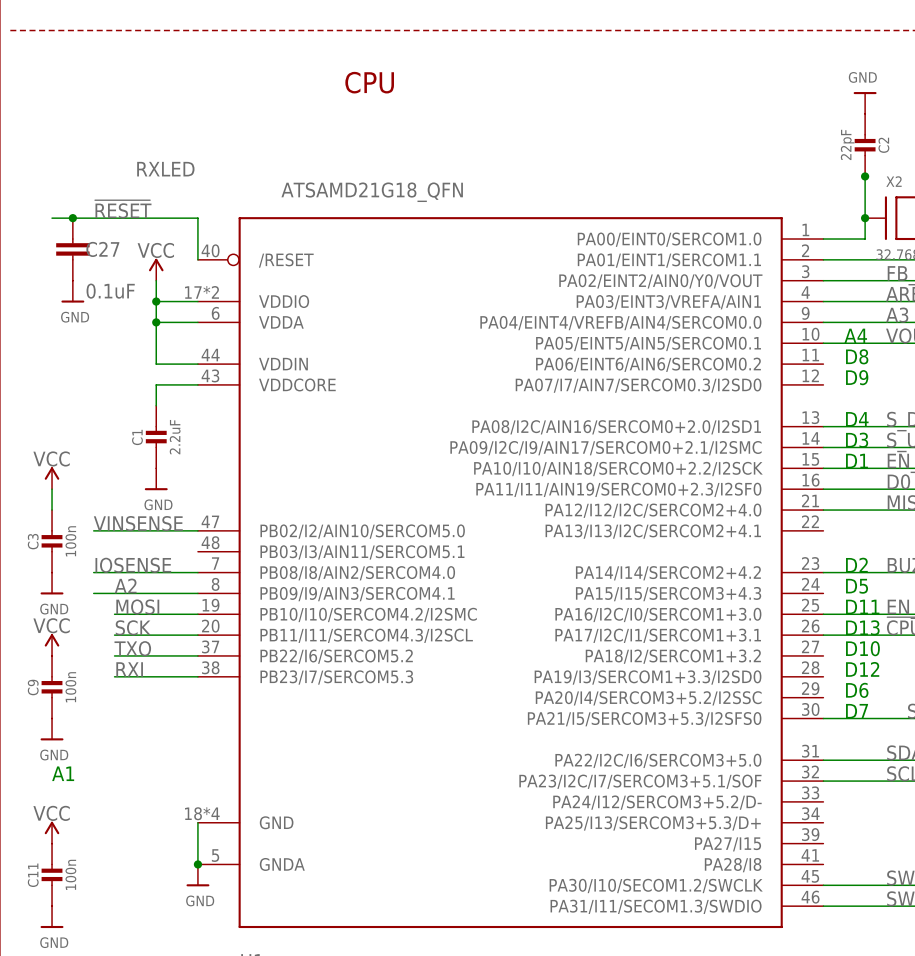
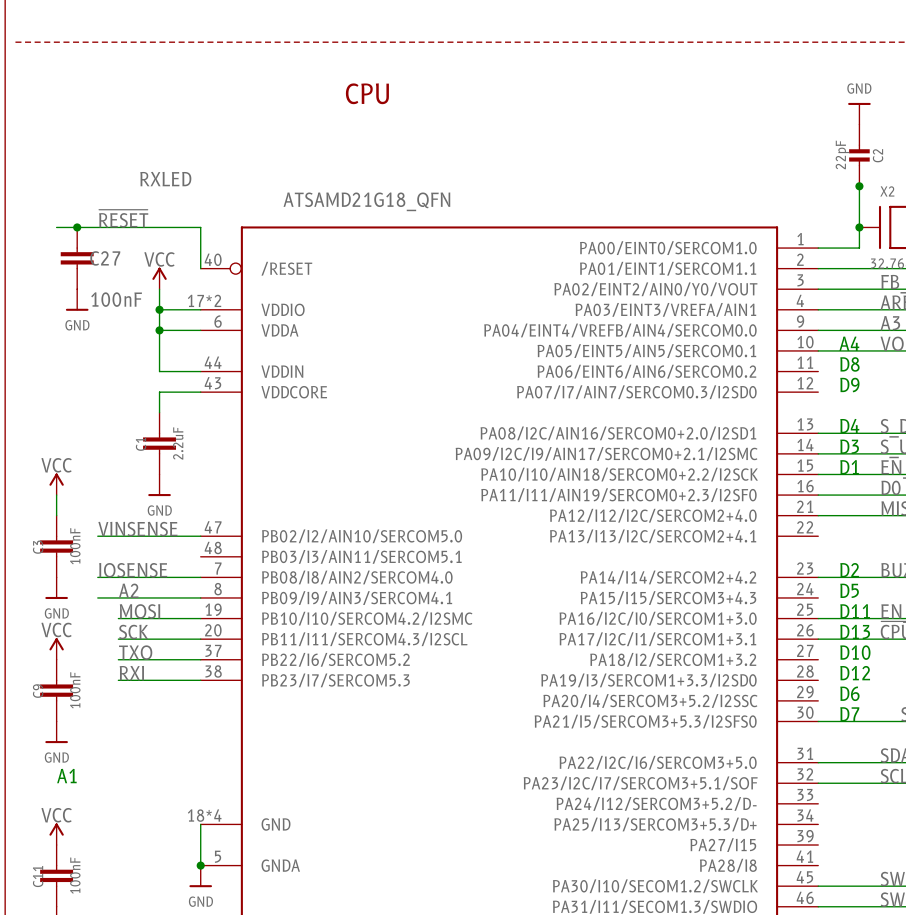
C27 value: 0.1uF (110, 291) -> 100nF (116, 299)
C1 symbol: [145, 405, 167, 469] -> [143, 412, 177, 475]
C3 symbol: [41, 510, 63, 573] -> [40, 515, 74, 578]
C3 value: 100n (70, 541) -> 100nF (75, 546)
C9 symbol: [41, 655, 63, 719] -> [40, 659, 74, 722]
C9 value: 100n (70, 687) -> 100nF (75, 690)
C11 symbol: [41, 843, 63, 907] -> [40, 845, 74, 907]
C11 value: 100n (70, 874) -> 100nF (75, 875)

